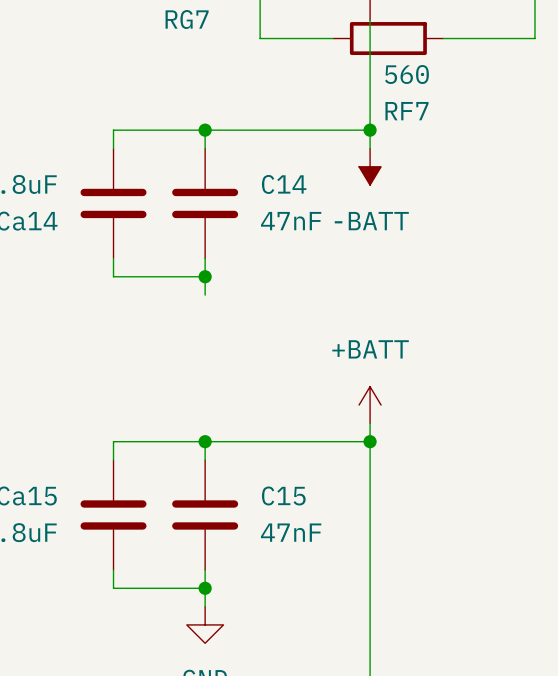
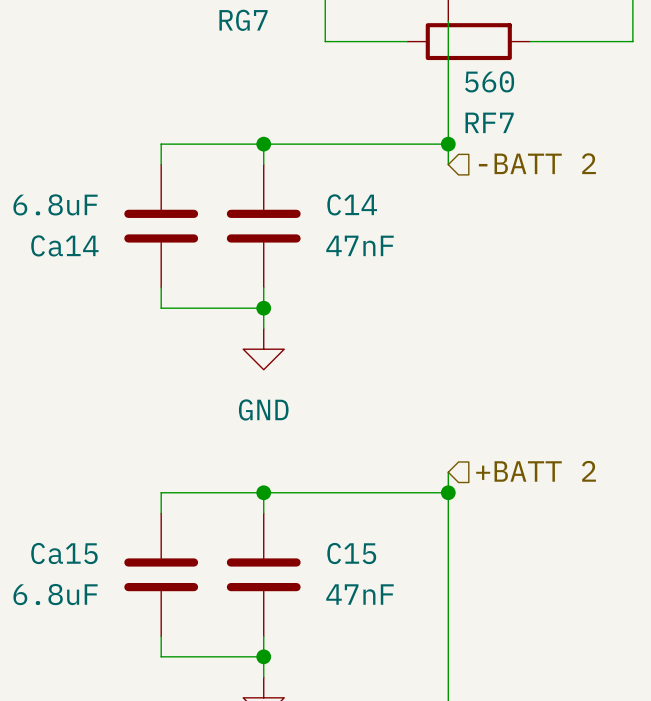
hierarchical label: none -> -BATT 2 (537, 163)
power symbol: -BATT (370, 166) -> none
power symbol: none -> GND (263, 349)
power symbol: +BATT (370, 405) -> none
hierarchical label: none -> +BATT 2 (536, 471)

